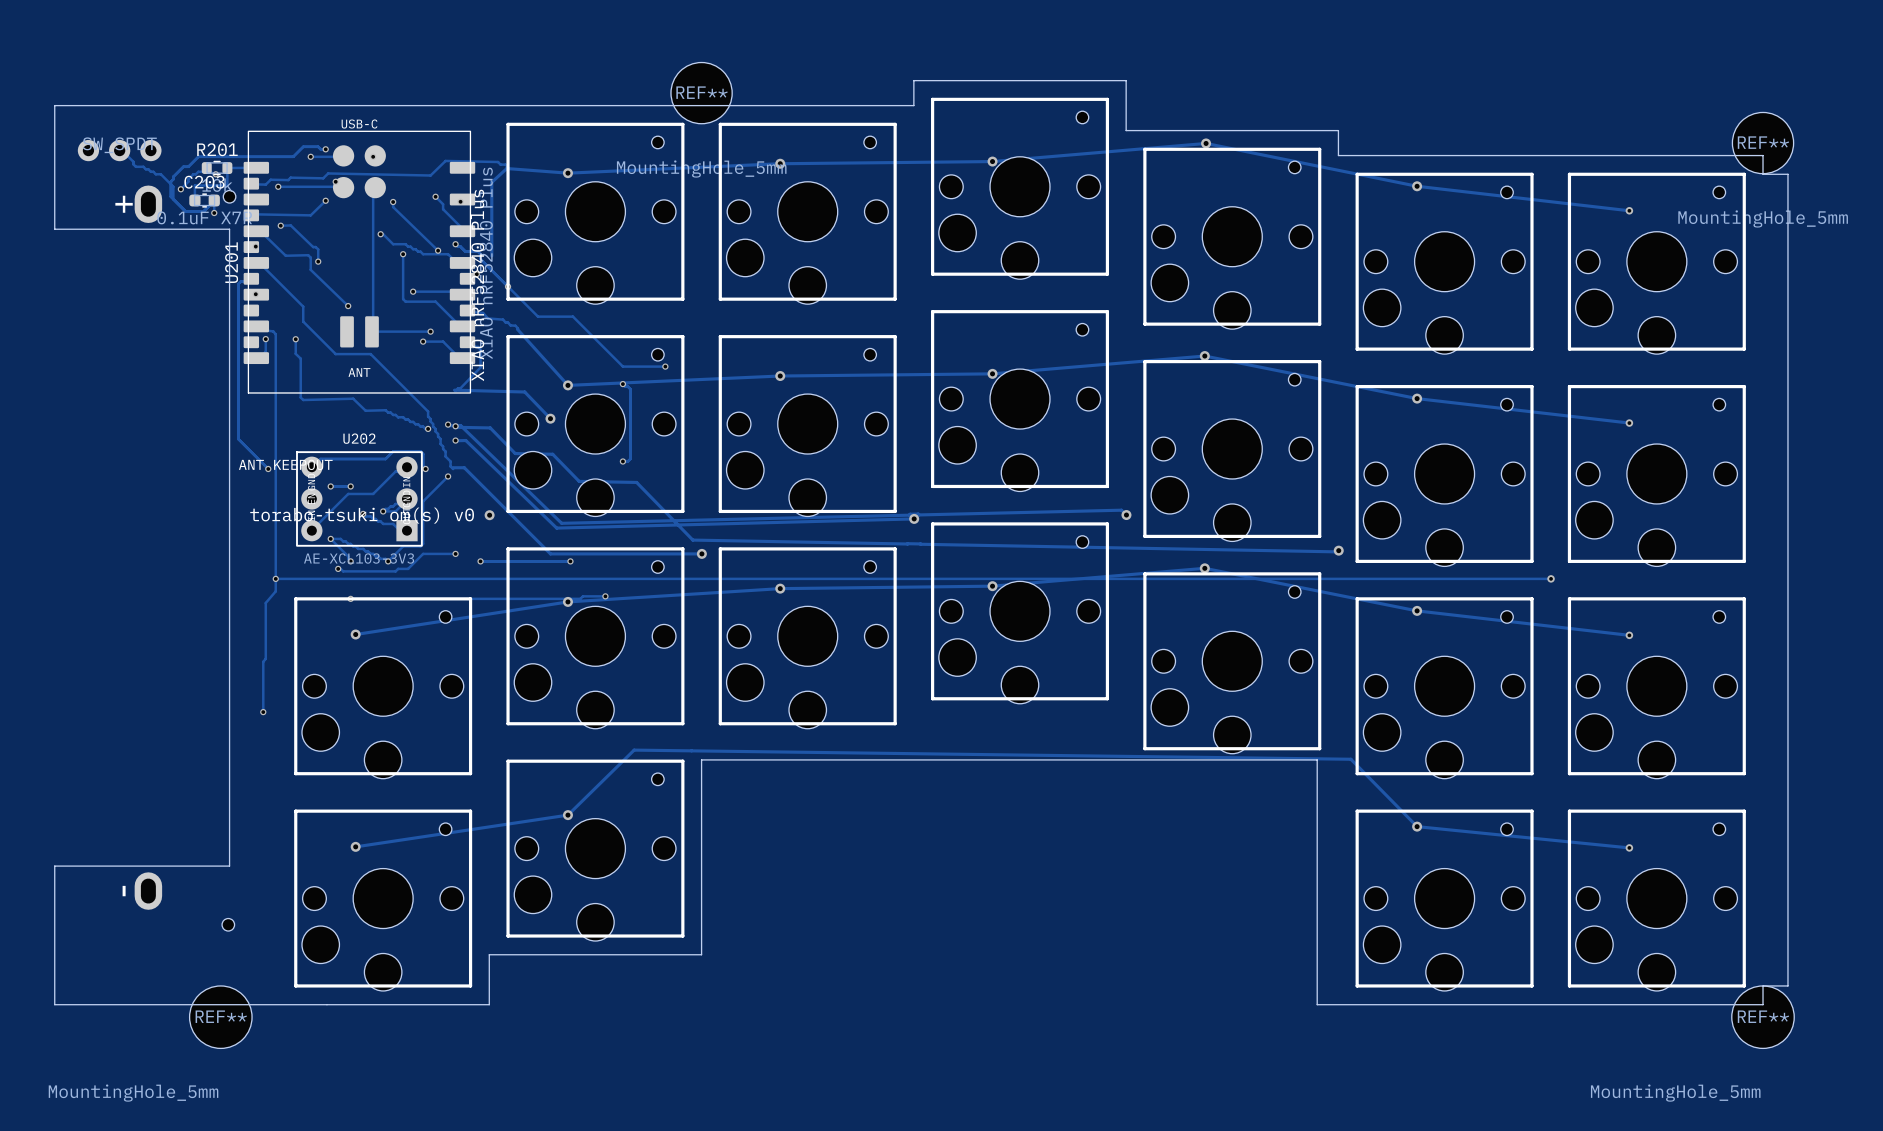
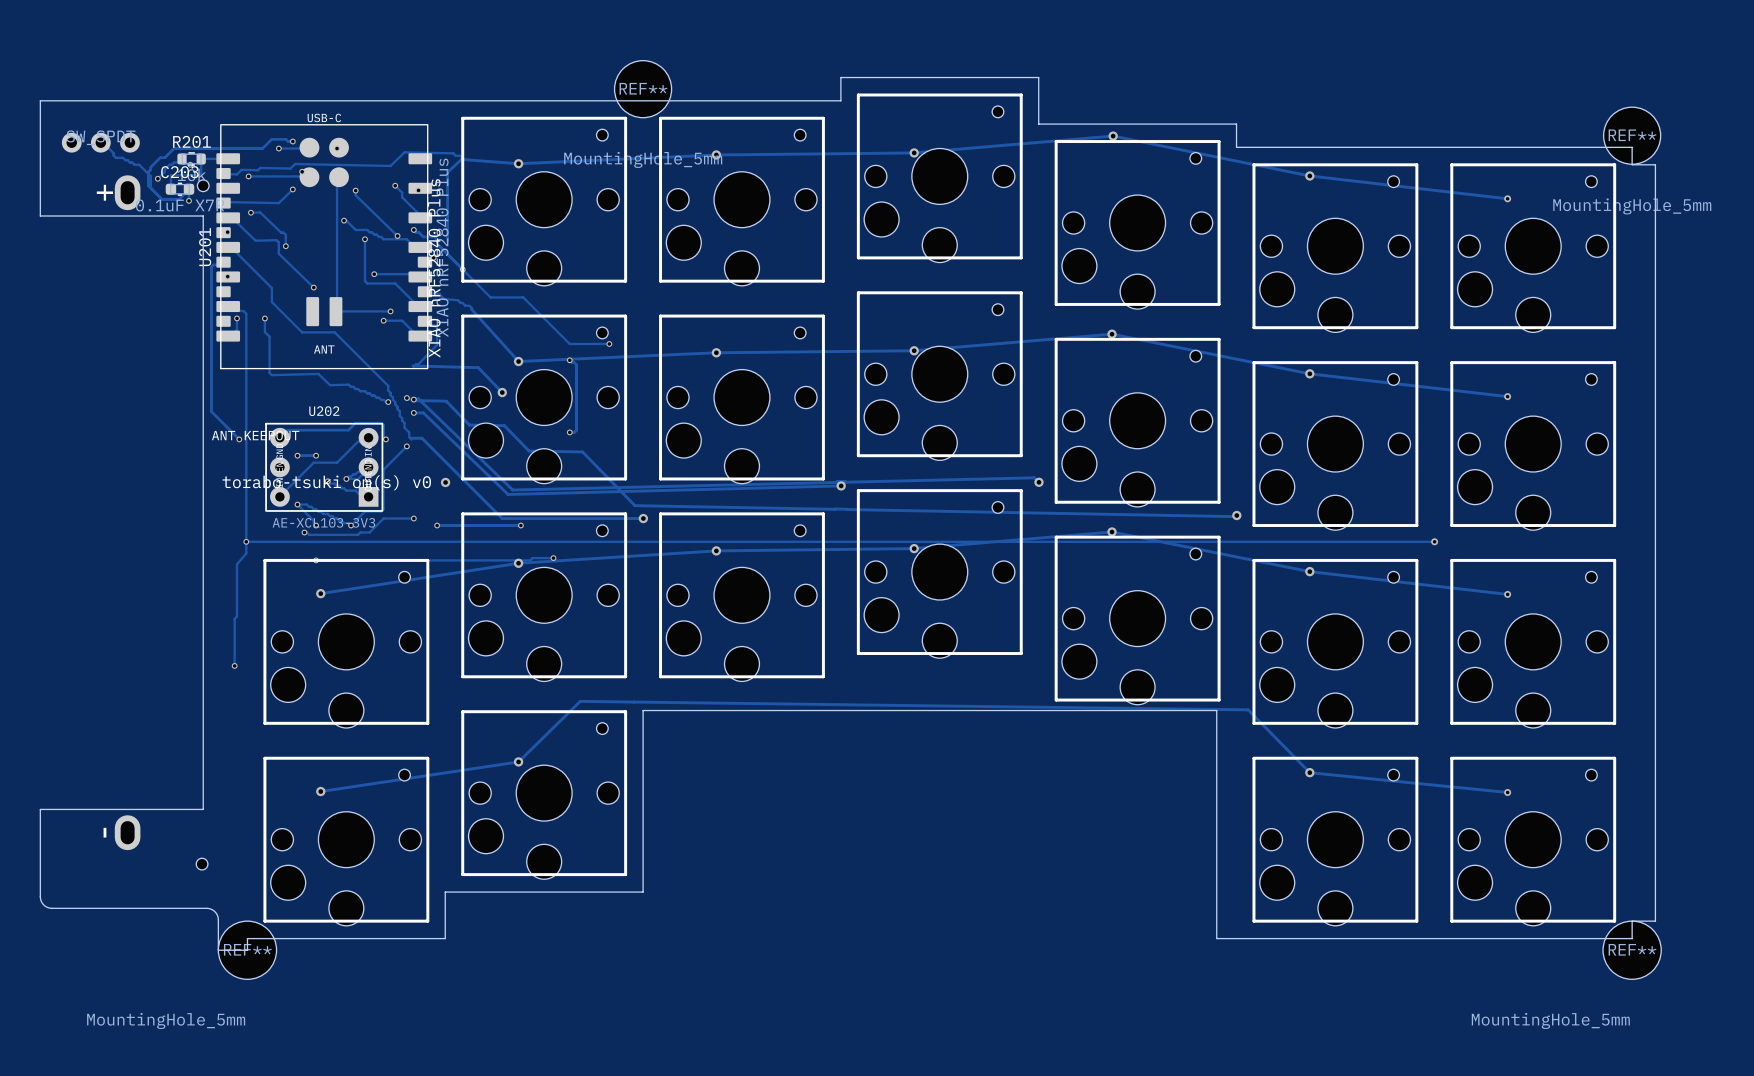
board edge: (54, 959) (54, 1004) (277, 1004) -> (40, 896) (42, 903) (50, 908) (209, 908) (214, 911) (218, 917) (218, 950) (247, 950) (247, 938)
REF** position: (220, 1017) -> (247, 950)

